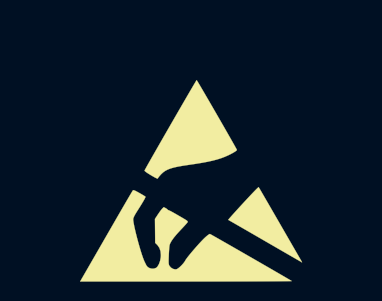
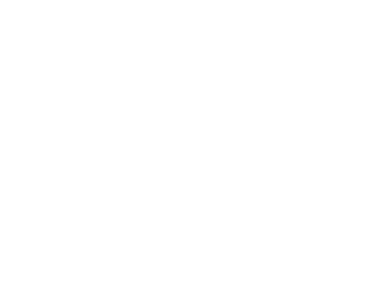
drawing: [79, 79, 303, 282] -> none

